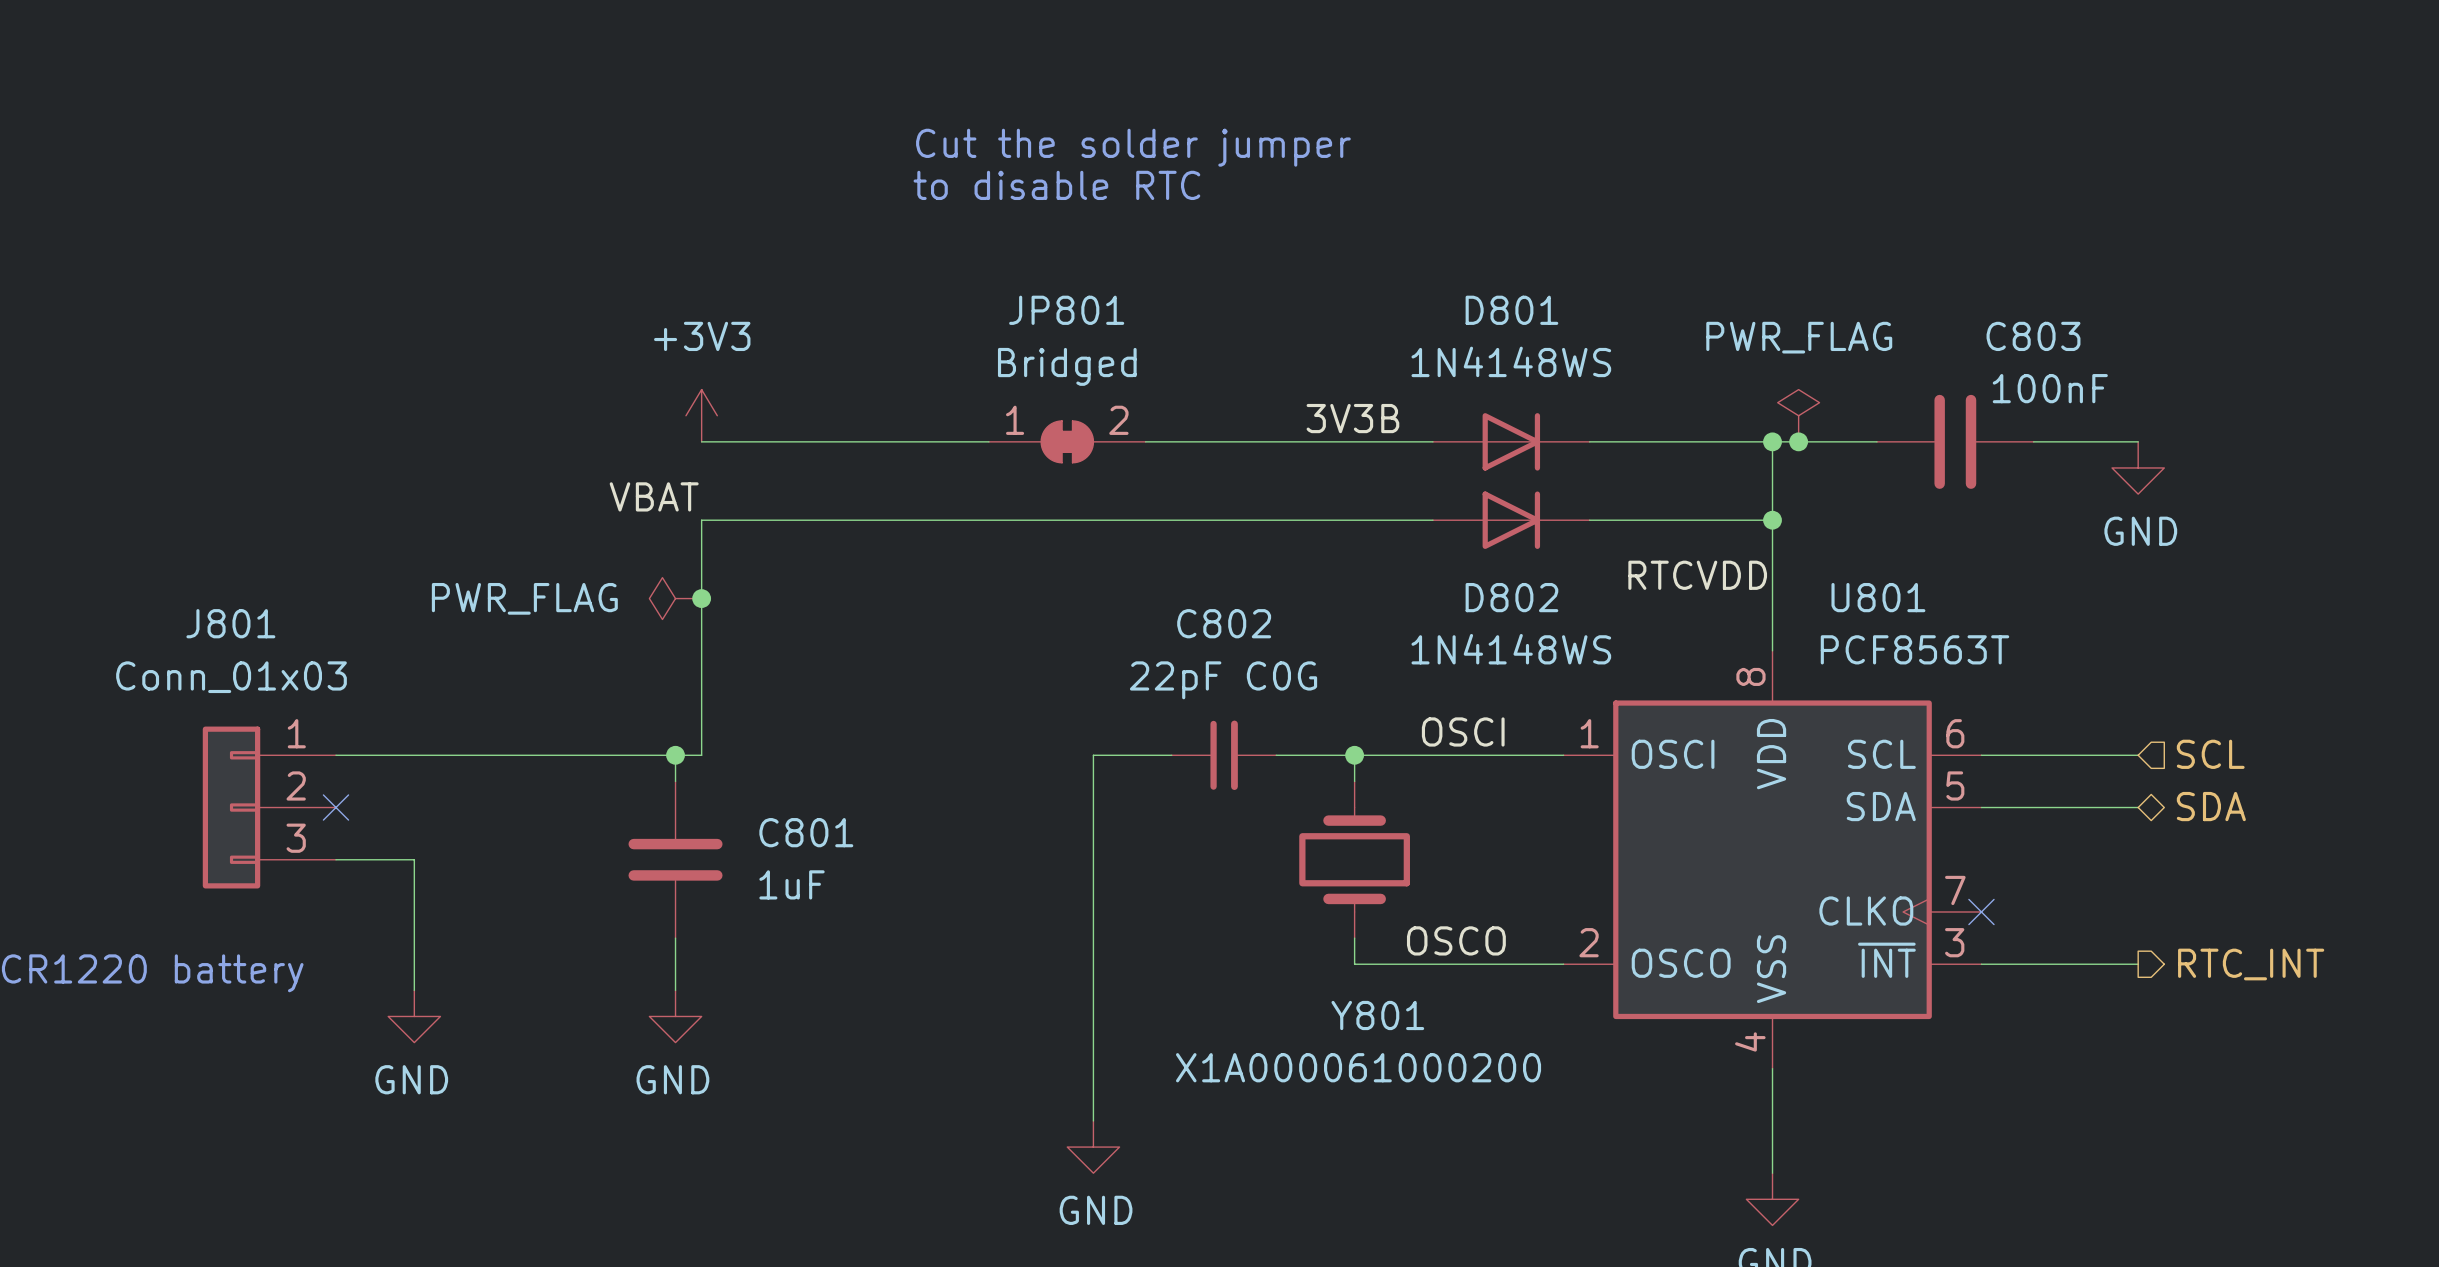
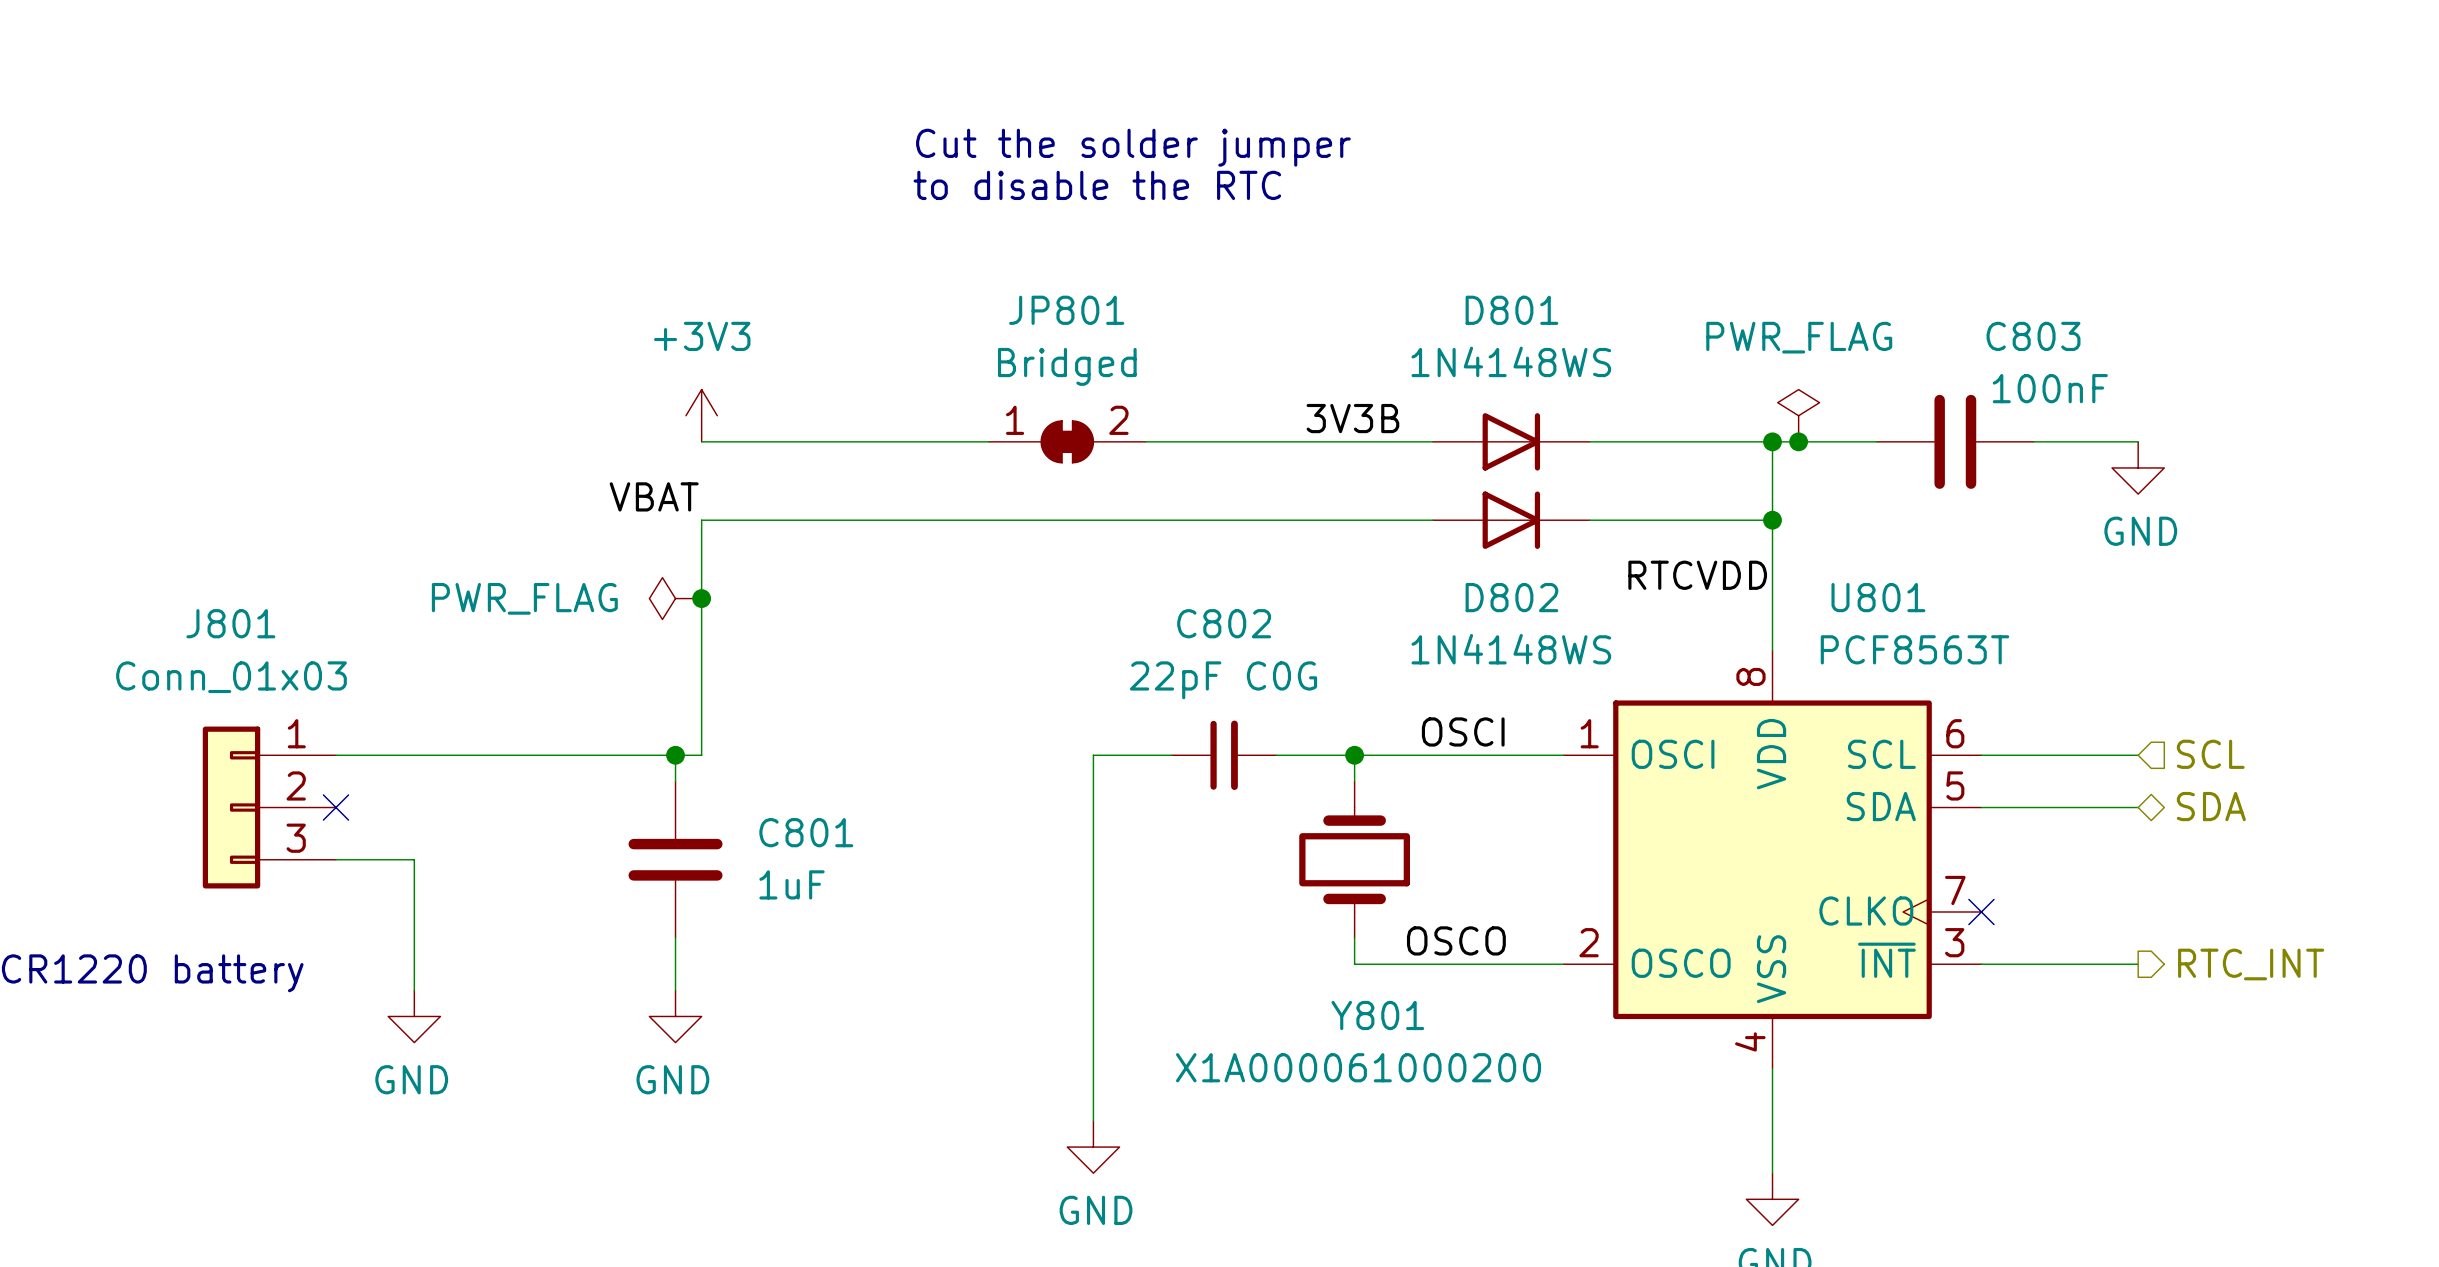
text: to disable RTC (1056, 185) -> to disable the RTC (1097, 185)

